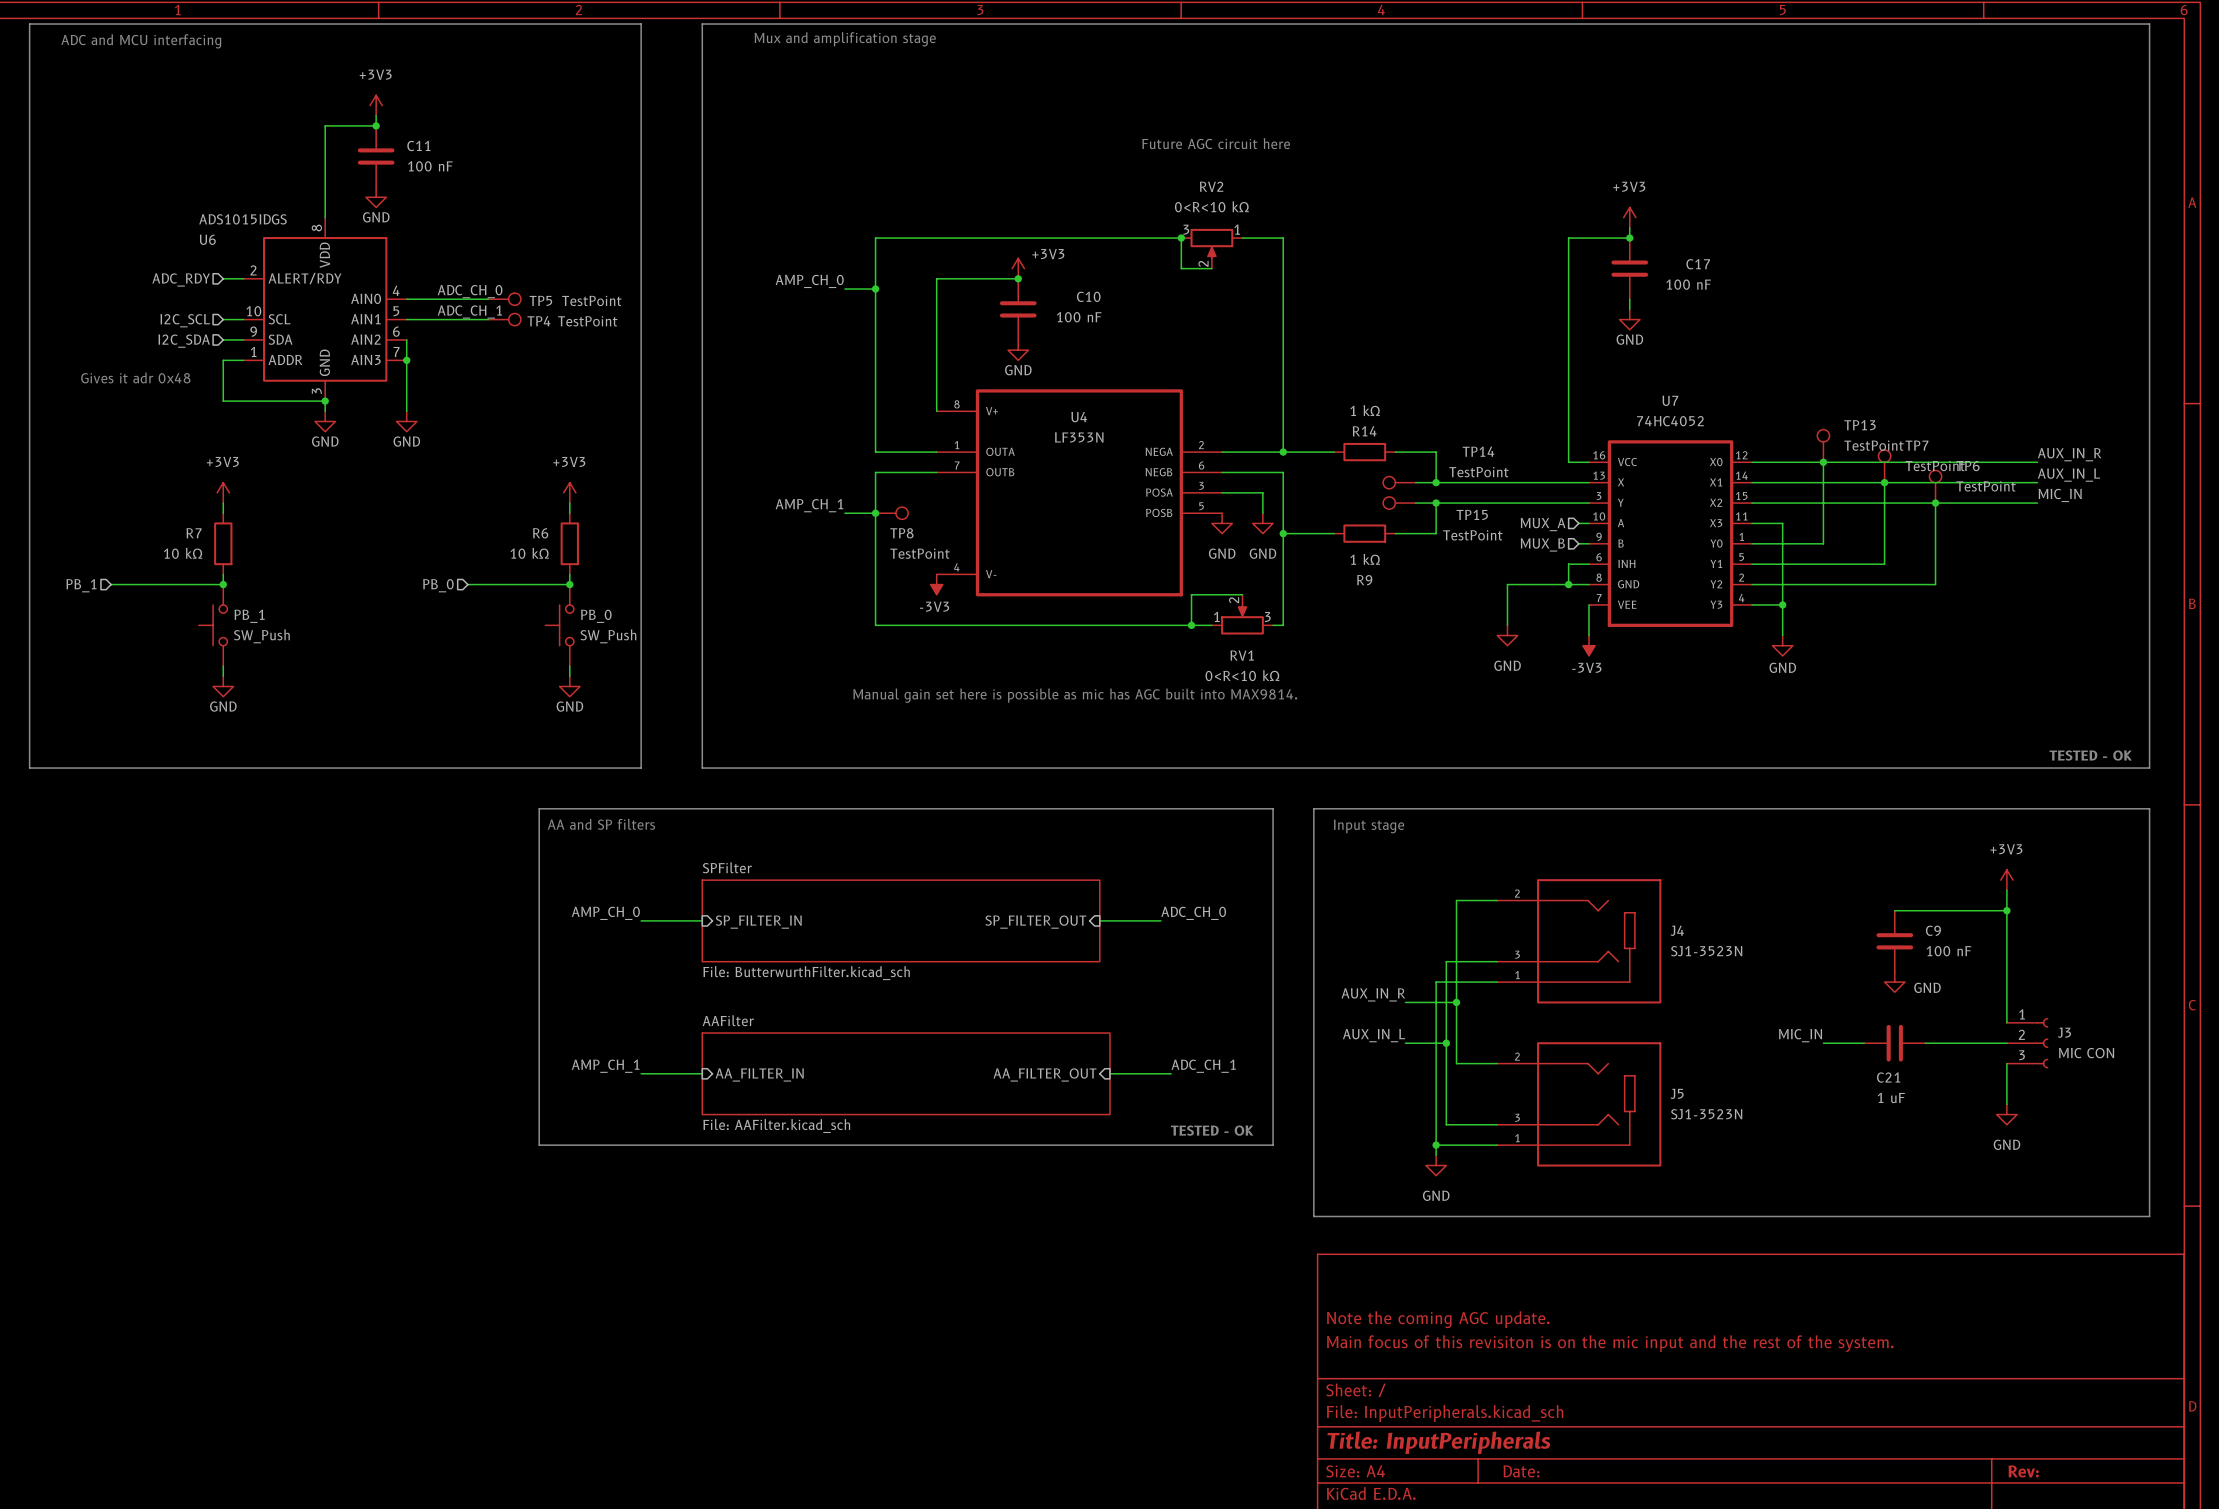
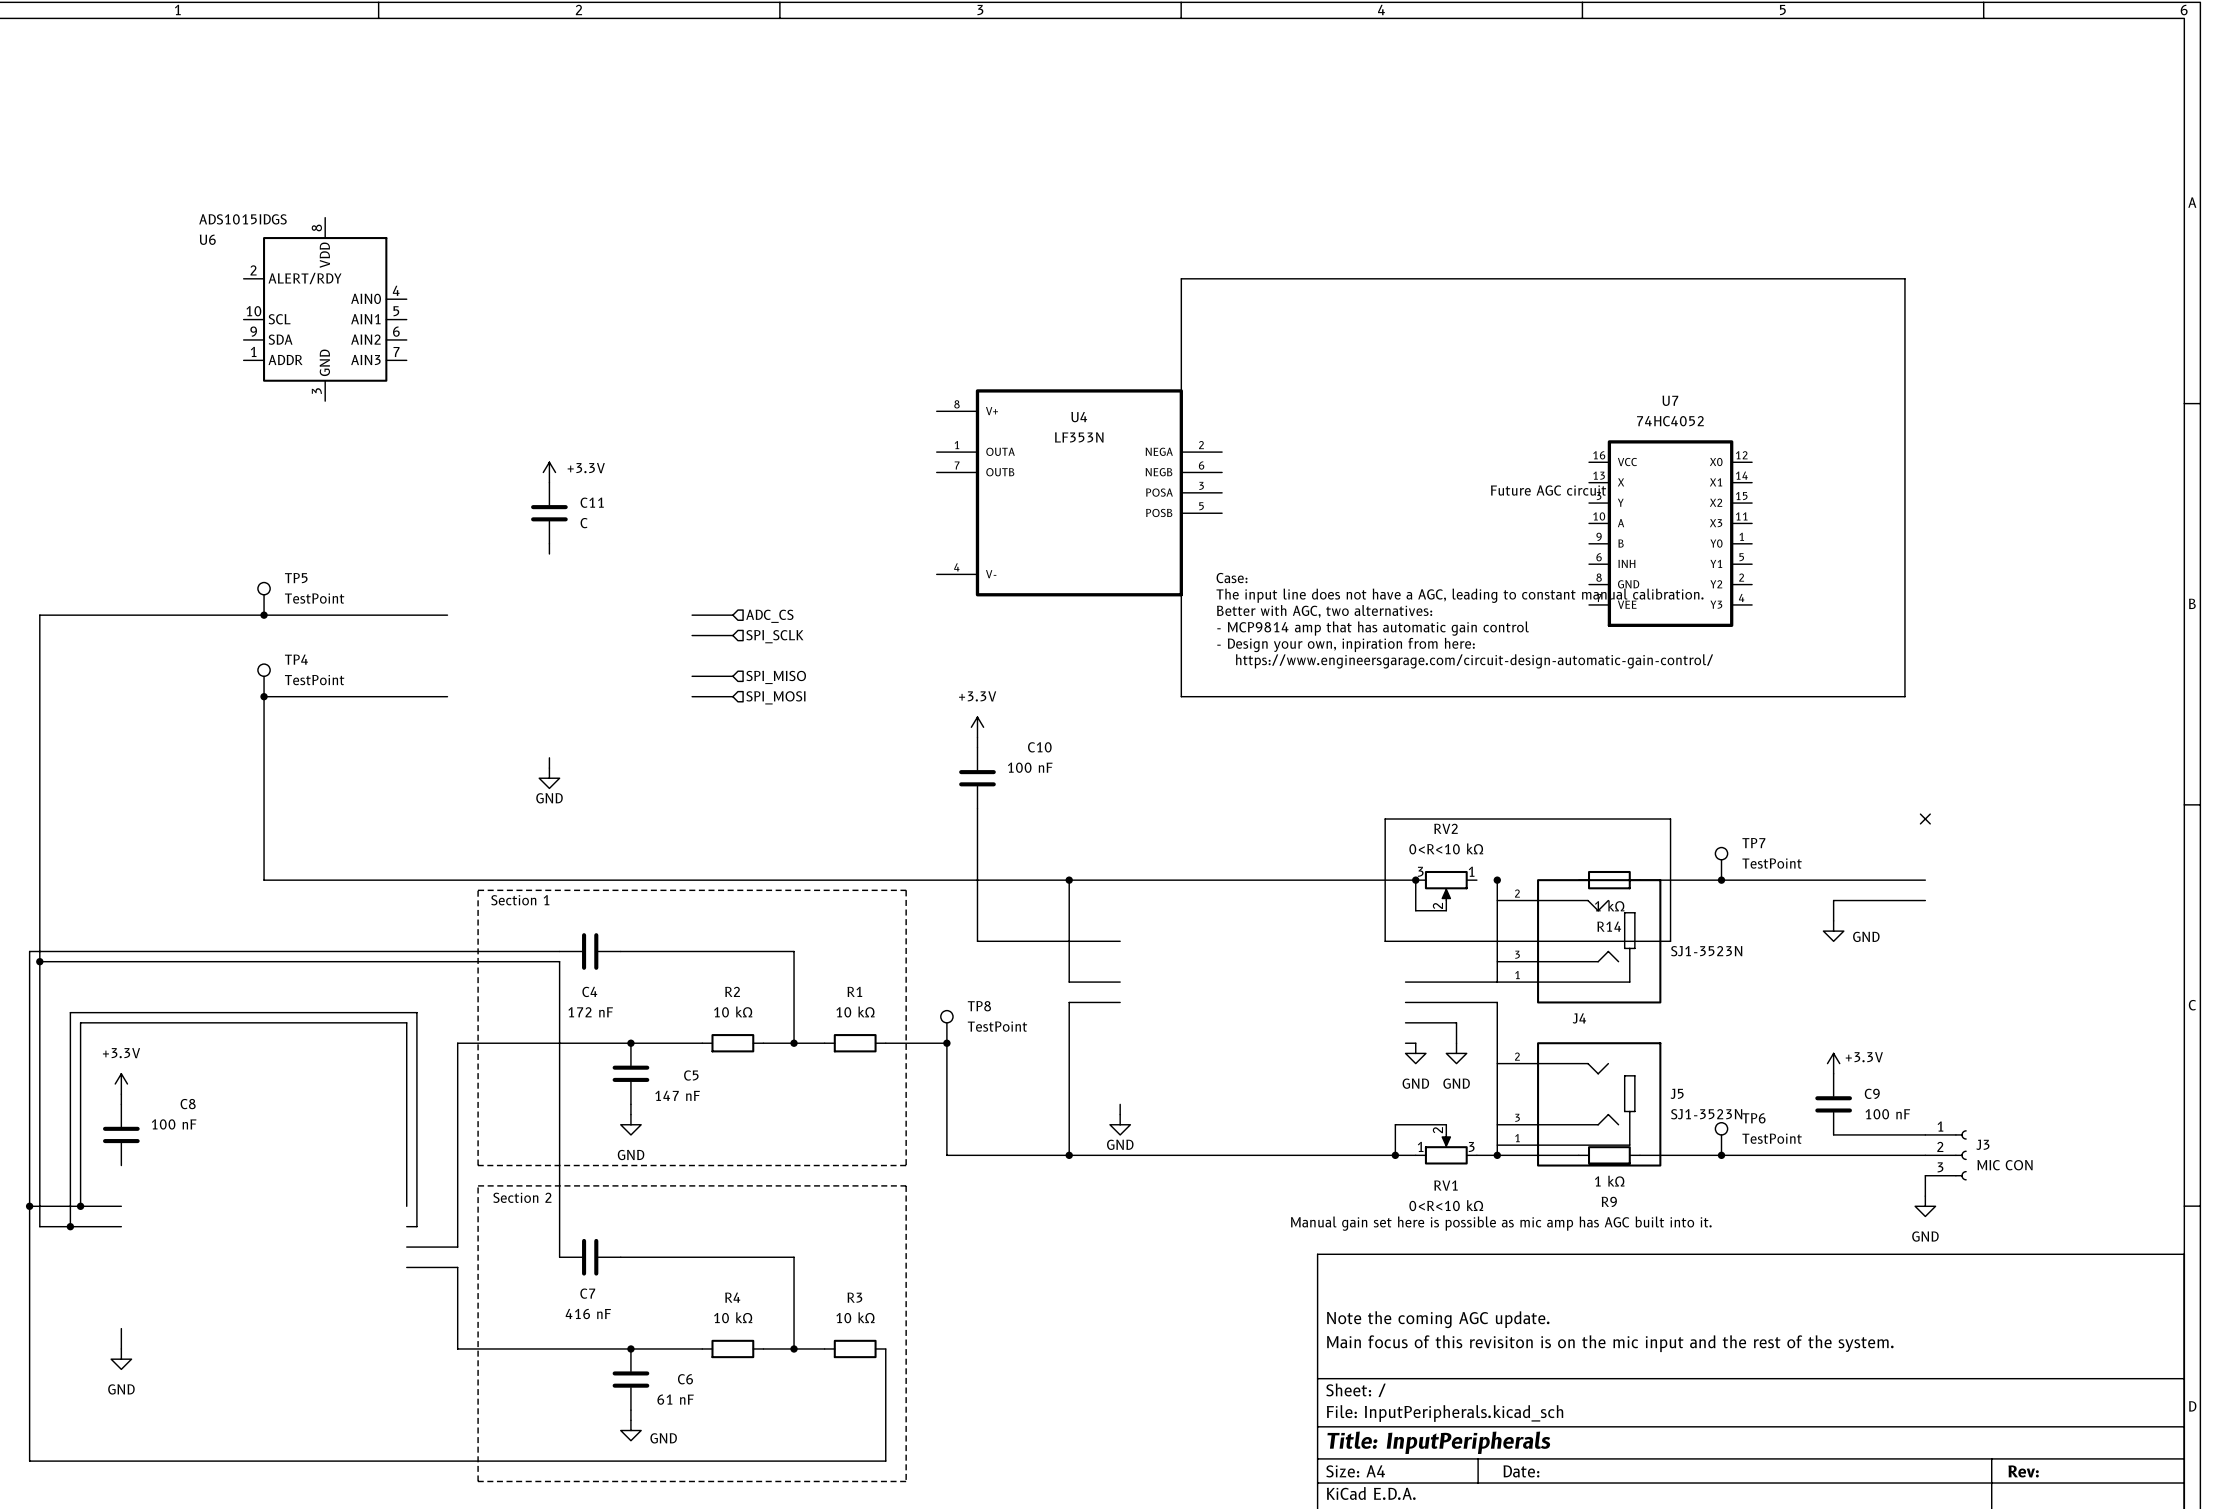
line: (29, 24) (641, 24) (641, 768) (29, 768) (29, 24) -> none
line: (702, 24) (2149, 24) (2149, 768) (702, 768) (702, 24) -> none
text: Mux and amplification stage (845, 39) -> none
text: ADC and MCU interfacing (141, 41) -> none
power symbol: +3V3 (376, 105) -> none
wire: (376, 115) (376, 125) (325, 125) (325, 217) -> none
junction: (376, 125) -> none
text: Future AGC circuit here (1216, 143) -> none
C11 position: (376, 156) -> (549, 513)
C11 value: 100 nF (430, 166) -> C (584, 523)
power symbol: GND (376, 197) -> none
power symbol: +3V3 (1629, 217) -> none
wire: (1629, 227) (1629, 238) (1568, 238) (1568, 462) (1589, 462) -> none
junction: (1181, 238) -> none
wire: (1242, 238) (1283, 238) (1283, 452) -> none
junction: (1629, 238) -> none
RV2 position: (1211, 248) -> (1446, 890)
power symbol: +3V3 (1018, 268) -> none
wire: (1211, 268) (1181, 268) (1181, 238) (875, 238) (875, 452) (936, 452) -> none
C17: 100 nF (1629, 268) -> none
wire: (223, 278) (243, 278) -> none
wire: (1018, 278) (936, 278) (936, 411) -> none
junction: (1018, 278) -> none
line: none -> (1181, 278) (1904, 278) (1904, 696) (1181, 696) (1181, 278)
hierarchical label: ADC_RDY (181, 279) -> none
label: AMP_CH_0 (809, 281) -> none
wire: (844, 289) (875, 289) -> none
junction: (875, 289) -> none
label: ADC_CH_0 (470, 291) -> none
C10 name position: C10 (1088, 296) -> C10 (1039, 747)
wire: (406, 299) (488, 299) -> none
TP5 position: (504, 299) -> (264, 598)
TP5 rotation: 0° (514, 299) -> 90° counterclockwise (264, 588)
wire: (1629, 299) (1629, 309) -> none
TP5 name position: TP5 (540, 300) -> TP5 (296, 578)
TP5 value position: TestPoint (591, 300) -> TestPoint (314, 598)
C10 position: (1018, 309) -> (977, 778)
label: ADC_CH_1 (469, 312) -> none
C10 value position: 100 nF (1079, 317) -> 100 nF (1030, 767)
wire: (223, 319) (243, 319) -> none
wire: (406, 319) (488, 319) -> none
TP4 position: (504, 319) -> (264, 680)
TP4 rotation: 0° (514, 319) -> 90° counterclockwise (264, 670)
power symbol: GND (1629, 319) -> none
hierarchical label: I2C_SCL (185, 320) -> none
TP4 name position: TP4 (538, 321) -> TP4 (296, 659)
TP4 value position: TestPoint (587, 321) -> TestPoint (314, 680)
wire: (223, 339) (243, 339) -> none
wire: (406, 339) (406, 411) -> none
hierarchical label: I2C_SDA (184, 341) -> none
power symbol: GND (1018, 350) -> none
wire: (243, 360) (223, 360) (223, 401) (325, 401) (325, 411) -> none
junction: (406, 360) -> none
text: Gives it adr 0x48 (135, 377) -> none
junction: (325, 401) -> none
R14 value position: 1 kΩ (1365, 410) -> 1 kΩ (1609, 905)
power symbol: GND (325, 421) -> none
power symbol: GND (406, 421) -> none
R14 name position: R14 (1364, 431) -> R14 (1609, 926)
TP13: TestPoint (1823, 445) -> none
wire: (1222, 452) (1334, 452) -> none
junction: (1283, 452) -> none
R14 position: (1364, 452) -> (1609, 880)
wire: (1395, 452) (1436, 452) (1436, 482) -> none
label: AUX_IN_R (2069, 454) -> none
wire: (1752, 462) (2037, 462) -> none
wire: (1823, 462) (1823, 543) (1752, 543) -> none
junction: (1823, 462) -> none
TP7 position: (1884, 466) -> (1721, 863)
power symbol: none -> +3.3V (549, 472)
wire: (936, 472) (875, 472) (875, 625) (1211, 625) -> none
wire: (1222, 472) (1283, 472) (1283, 625) (1273, 625) -> none
label: AUX_IN_L (2068, 475) -> none
TP14: TestPoint (1399, 482) -> none
wire: (1415, 482) (1589, 482) -> none
junction: (1436, 482) -> none
wire: (1752, 482) (2037, 482) -> none
wire: (1884, 482) (1884, 564) (1752, 564) -> none
junction: (1884, 482) -> none
TP6 position: (1935, 486) -> (1721, 1139)
text: none -> Future AGC circuit (1548, 490)
power symbol: +3V3 (223, 492) -> none
power symbol: +3V3 (569, 492) -> none
wire: (1222, 492) (1262, 492) (1262, 513) -> none
label: MIC_IN (2060, 495) -> none
wire: (223, 503) (223, 513) -> none
wire: (569, 503) (569, 513) -> (549, 543) (549, 554)
TP15: TestPoint (1399, 503) -> none
wire: (1415, 503) (1589, 503) -> none
wire: (1436, 503) (1436, 533) (1395, 533) -> none
junction: (1436, 503) -> none
wire: (1752, 503) (2037, 503) -> none
wire: (1935, 503) (1935, 584) (1752, 584) -> none
junction: (1935, 503) -> none
label: AMP_CH_1 (809, 505) -> none
wire: (844, 513) (875, 513) -> none
junction: (875, 513) -> none
TP8 position: (891, 513) -> (946, 1026)
TP8 rotation: 0° (902, 513) -> 90° counterclockwise (946, 1016)
power symbol: GND (1222, 523) -> none
power symbol: GND (1262, 523) -> none
wire: (1578, 523) (1589, 523) -> none
wire: (1752, 523) (1782, 523) (1782, 635) -> none
hierarchical label: MUX_A (1543, 524) -> none
TP8 name position: TP8 (901, 533) -> TP8 (979, 1006)
wire: (1283, 533) (1334, 533) -> none
junction: (1283, 533) -> none
R9 position: (1364, 533) -> (1609, 1155)
R7: 10 kΩ (223, 543) -> none
R6: 10 kΩ (569, 543) -> none
wire: (1578, 543) (1589, 543) -> none
hierarchical label: MUX_B (1542, 544) -> none
TP8 value position: TestPoint (920, 553) -> TestPoint (997, 1026)
wire: (1589, 564) (1568, 564) (1568, 584) -> none
wire: (223, 574) (223, 584) (111, 584) -> none
wire: (569, 574) (569, 584) (467, 584) -> none
text: none -> Case: (1232, 578)
junction: (223, 584) -> none
junction: (569, 584) -> none
power symbol: -3V3 (936, 584) -> none
junction: (1568, 584) -> none
wire: (1589, 584) (1507, 584) (1507, 625) -> none
hierarchical label: PB_1 (81, 585) -> none
hierarchical label: PB_0 (438, 585) -> none
wire: (1242, 594) (1191, 594) (1191, 625) -> none
text: none -> The input line does not have a AGC, leading to constant manual calibration. (1460, 595)
wire: (1589, 604) (1589, 635) -> none
wire: (1752, 604) (1782, 604) -> none
junction: (1782, 604) -> none
text: none -> Better with AGC, two alternatives: (1324, 611)
RV1 position: (1242, 614) -> (1446, 1144)
junction: none -> (264, 615)
wire: none -> (447, 615) (39, 615) (39, 1226) (121, 1226)
wire: none -> (692, 615) (732, 615)
hierarchical label: none -> ADC_CS (769, 616)
PB_1: SW_Push (213, 625) -> none
PB_0: SW_Push (559, 625) -> none
junction: (1191, 625) -> none
text: none -> - MCP9814 amp that has automatic gain control (1373, 628)
wire: none -> (692, 635) (732, 635)
power symbol: GND (1507, 635) -> none
hierarchical label: none -> SPI_SCLK (774, 636)
text: none -> - Design your own, inpiration from here: (1346, 644)
power symbol: -3V3 (1589, 645) -> none
power symbol: GND (1782, 645) -> none
text: none -> https://www.engineersgarage.com/circuit-design-automatic-gain-control/ (1474, 661)
wire: (223, 666) (223, 676) -> none
wire: (569, 666) (569, 676) -> (549, 757) (549, 768)
wire: none -> (692, 676) (732, 676)
hierarchical label: none -> SPI_MISO (776, 677)
power symbol: GND (223, 686) -> none
power symbol position: GND (569, 686) -> GND (549, 778)
text: Manual gain set here is possible as mic has AGC built into MAX9814. (1075, 695) -> none
junction: none -> (264, 696)
wire: none -> (447, 696) (264, 696) (264, 880) (1415, 880) (1415, 910) (1446, 910)
wire: none -> (692, 696) (732, 696)
hierarchical label: none -> SPI_MOSI (775, 697)
power symbol: none -> +3.3V (977, 727)
wire: none -> (977, 737) (977, 747)
text: TESTED - OK (2090, 755) -> none
line: (539, 808) (1273, 808) (1273, 1145) (539, 1145) (539, 808) -> none
wire: none -> (977, 808) (977, 941) (1120, 941)
line: (1313, 808) (2149, 808) (2149, 1216) (1313, 1216) (1313, 808) -> none
line: none -> (1385, 818) (1670, 818) (1670, 941) (1385, 941) (1385, 818)
no-connect mark: none -> (1925, 818)
text: AA and SP filters (601, 824) -> none
text: Input stage (1369, 826) -> none
wire: none -> (1069, 880) (1069, 982) (1120, 982)
junction: none -> (1069, 880)
junction: none -> (1415, 880)
wire: none -> (1497, 880) (1497, 982)
junction: none -> (1497, 880)
wire: none -> (1639, 880) (1925, 880)
junction: none -> (1721, 880)
power symbol: +3V3 (2006, 880) -> none
line: none -> (478, 890) (906, 890) (906, 1165) (478, 1165) (478, 890)
wire: (2006, 890) (2006, 1022) -> none
text: none -> Section 1 (520, 900)
wire: (1497, 900) (1456, 900) (1456, 1022) -> (1405, 1022) (1456, 1022)
wire: none -> (1925, 900) (1833, 900) (1833, 920)
wire: (1894, 910) (2006, 910) -> none
junction: (2006, 910) -> none
label: AMP_CH_0 (605, 913) -> none
label: ADC_CH_0 (1193, 913) -> none
wire: (641, 920) (702, 920) -> none
sheet SPFilter: File: ButterwurthFilter.kicad_sch (901, 920) -> none
wire: (1099, 920) (1160, 920) -> none
sheet pin: SP_FILTER_IN (758, 922) -> none
sheet pin: SP_FILTER_OUT (1035, 922) -> none
J4 name position: J4 (1677, 930) -> J4 (1579, 1018)
C9 position: (1894, 941) -> (1833, 1104)
wire: none -> (559, 951) (29, 951) (29, 1461) (885, 1461) (885, 1348)
C4: none -> 172 nF (590, 951)
wire: none -> (620, 951) (794, 951) (794, 1043)
wire: none -> (39, 961) (559, 961) (559, 1257)
junction: none -> (39, 961)
wire: (1497, 961) (1446, 961) (1446, 1124) (1497, 1124) -> none
wire: (1436, 982) (1436, 1155) -> (1436, 982) (1405, 982)
power symbol position: GND (1894, 982) -> GND (1833, 931)
label: AUX_IN_R (1373, 994) -> none
wire: none -> (1120, 1002) (1069, 1002) (1069, 1155)
wire: none -> (1456, 1002) (1497, 1002) (1497, 1155)
junction: (1456, 1002) -> none
label: AUX_IN_L (1374, 1035) -> none
label: MIC_IN (1800, 1035) -> none
junction: none -> (630, 1043)
wire: none -> (702, 1043) (457, 1043) (457, 1247) (406, 1247)
R2: none -> 10 kΩ (732, 1043)
junction: none -> (794, 1043)
R1: none -> 10 kΩ (855, 1043)
wire: none -> (885, 1043) (946, 1043) (946, 1155) (1415, 1155)
junction: none -> (946, 1043)
wire: (1415, 1043) (1446, 1043) -> none
junction: (1446, 1043) -> none
wire: (1456, 1043) (1456, 1063) (1497, 1063) -> none
wire: (1823, 1043) (1864, 1043) -> none
C21: 1 uF (1894, 1043) -> none
wire: (1925, 1043) (2006, 1043) -> none
J3 position: (2027, 1043) -> (1946, 1155)
power symbol: none -> GND (1415, 1053)
power symbol: none -> GND (1456, 1053)
power symbol: none -> +3.3V (1833, 1063)
wire: (2006, 1063) (2006, 1104) -> none
label: AMP_CH_1 (605, 1066) -> none
label: ADC_CH_1 (1203, 1066) -> none
C5: none -> 147 nF (630, 1073)
wire: (641, 1073) (702, 1073) -> (763, 1043) (824, 1043)
sheet AAFilter: File: AAFilter.kicad_sch (906, 1073) -> none
wire: (1109, 1073) (1171, 1073) -> none
sheet pin: AA_FILTER_IN (759, 1074) -> none
sheet pin: AA_FILTER_OUT (1044, 1074) -> none
power symbol: none -> +3.3V (121, 1083)
wire: none -> (121, 1094) (121, 1104)
wire: none -> (630, 1104) (630, 1114)
wire: none -> (1120, 1104) (1120, 1114)
power symbol: GND (2006, 1114) -> none
power symbol: none -> GND (630, 1124)
power symbol: none -> GND (1120, 1124)
wire: none -> (1446, 1124) (1395, 1124) (1395, 1155)
text: TESTED - OK (1212, 1130) -> none
C8: none -> 100 nF (121, 1134)
wire: none -> (1833, 1134) (1925, 1134)
wire: (1436, 1145) (1497, 1145) -> none
junction: (1436, 1145) -> none
junction: none -> (1069, 1155)
junction: none -> (1395, 1155)
wire: none -> (1476, 1155) (1578, 1155)
junction: none -> (1497, 1155)
wire: none -> (1639, 1155) (1925, 1155)
junction: none -> (1721, 1155)
power symbol: GND (1436, 1165) -> none
wire: none -> (1925, 1175) (1925, 1196)
line: none -> (478, 1185) (478, 1481) (906, 1481) (906, 1185) (478, 1185)
text: none -> Section 2 (522, 1197)
wire: none -> (29, 1206) (121, 1206)
junction: none -> (29, 1206)
wire: none -> (80, 1206) (80, 1022) (406, 1022) (406, 1206)
junction: none -> (80, 1206)
power symbol: none -> GND (1925, 1206)
text: none -> Manual gain set here is possible as mic amp has AGC built into it. (1501, 1223)
wire: none -> (70, 1226) (70, 1012) (416, 1012) (416, 1226) (406, 1226)
junction: none -> (70, 1226)
C7: none -> 416 nF (590, 1257)
wire: none -> (620, 1257) (794, 1257) (794, 1348)
wire: none -> (406, 1267) (457, 1267) (457, 1348) (702, 1348)
wire: none -> (121, 1328) (121, 1348)
junction: none -> (630, 1348)
R4: none -> 10 kΩ (732, 1348)
wire: none -> (763, 1348) (824, 1348)
junction: none -> (794, 1348)
R3: none -> 10 kΩ (855, 1348)
power symbol: none -> GND (121, 1359)
C6: none -> 61 nF (630, 1379)
wire: none -> (630, 1410) (630, 1420)
power symbol: none -> GND (630, 1430)

